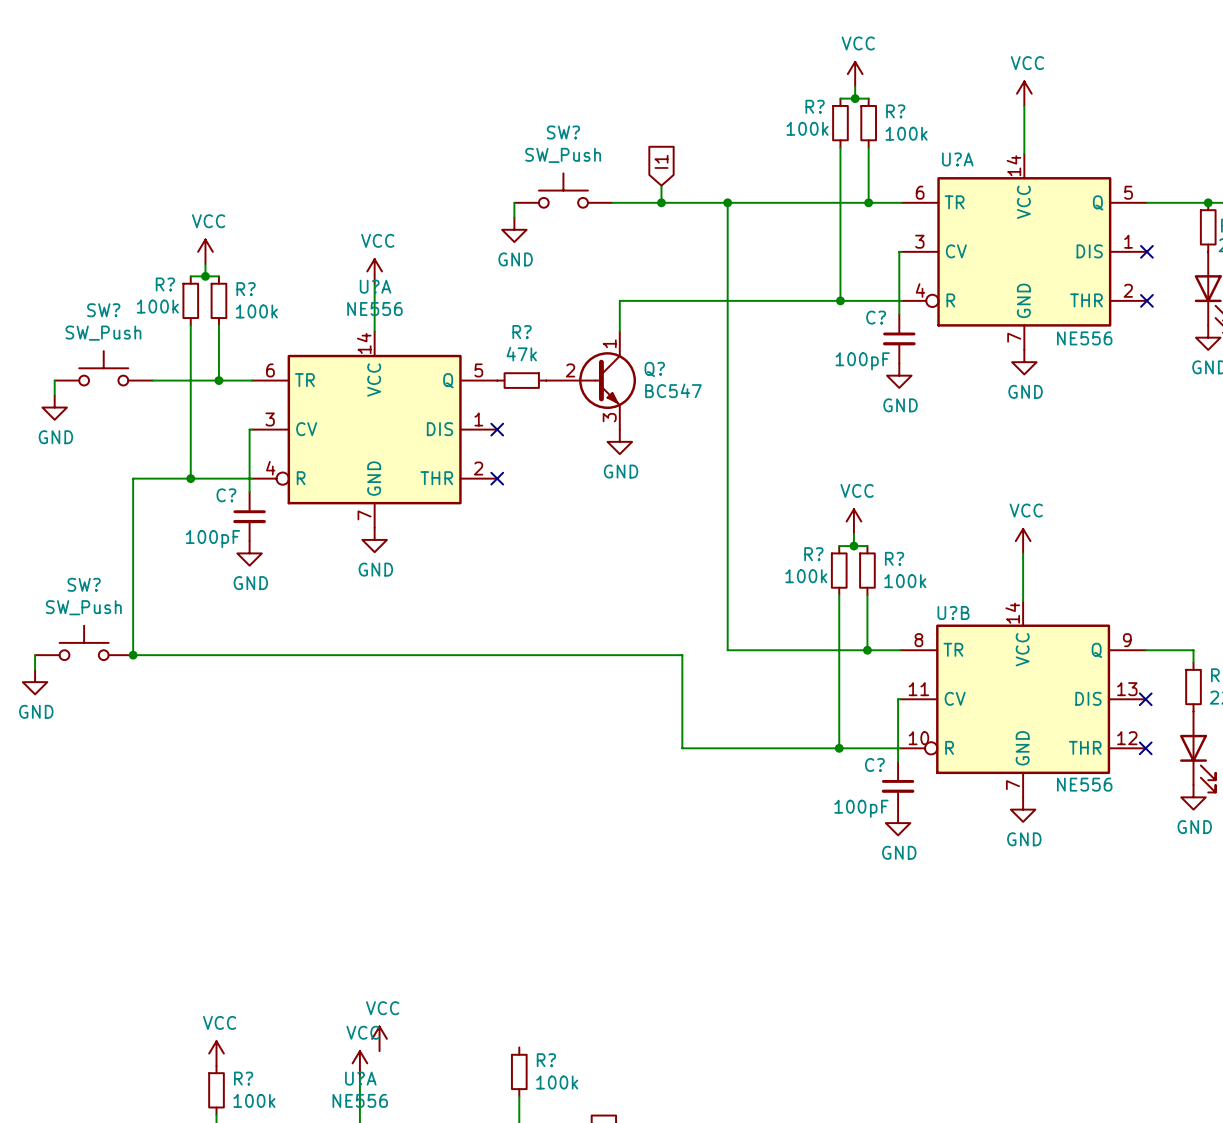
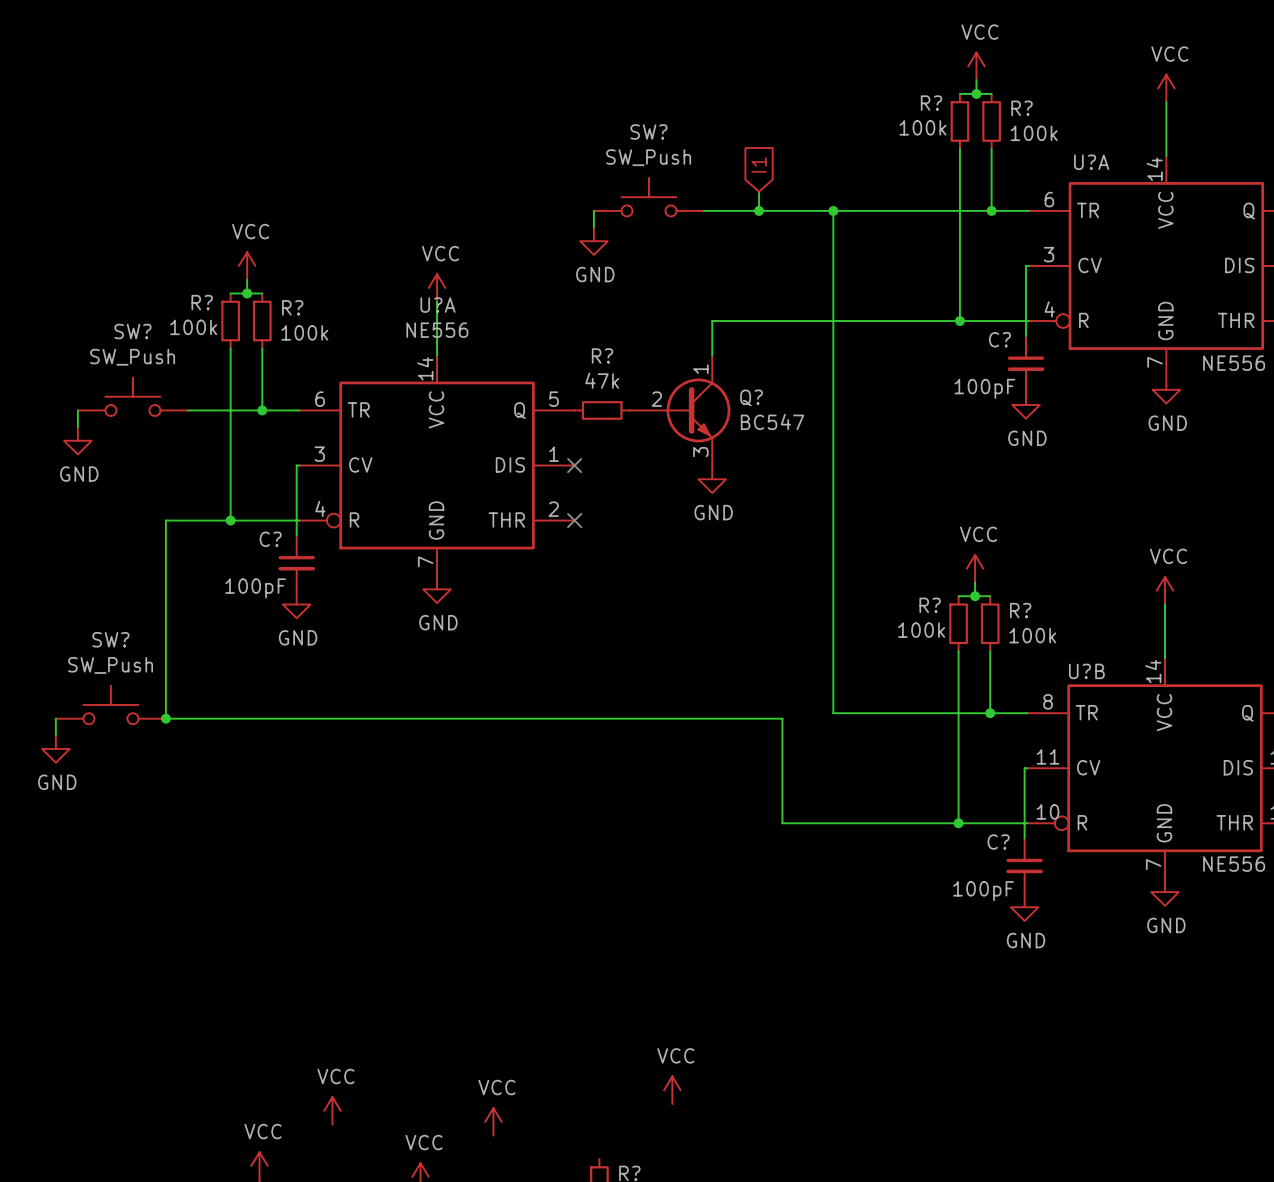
power symbol: none -> VCC (672, 1090)
power symbol: none -> VCC (332, 1110)
power symbol position: VCC (379, 1038) -> VCC (493, 1121)

